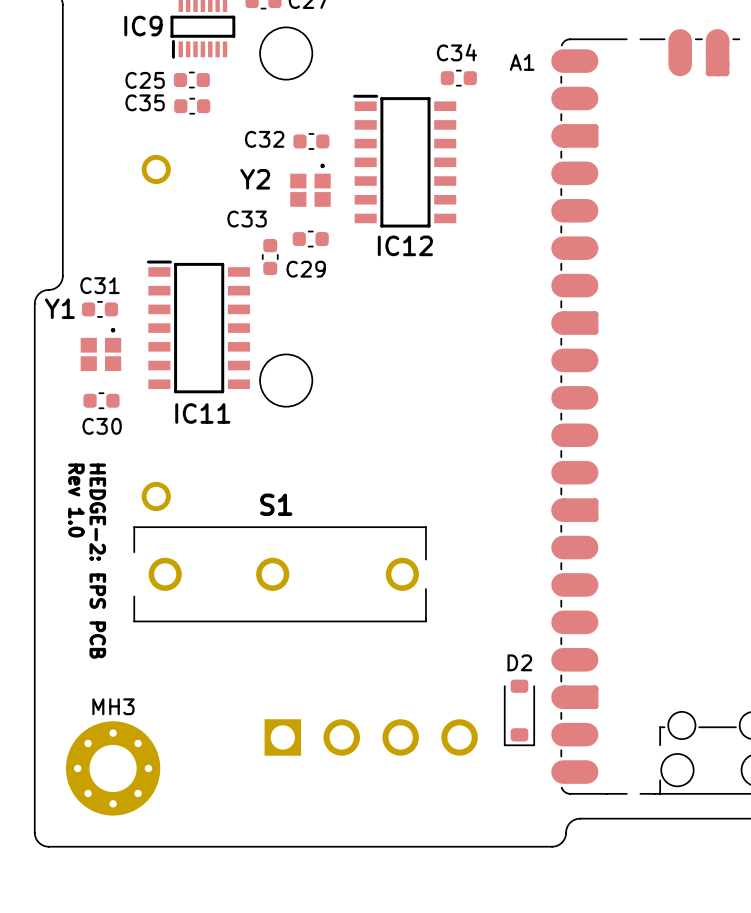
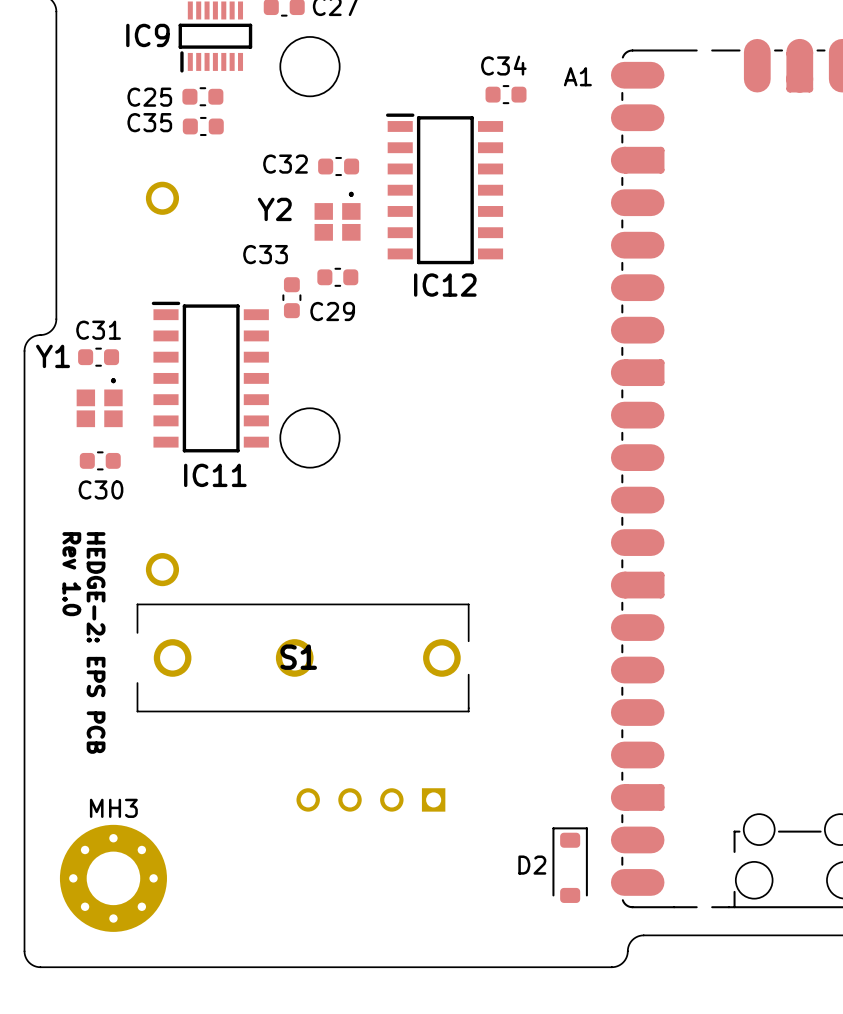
S1 name position: S1 (276, 504) -> S1 (298, 657)
D2 name position: D2 (519, 662) -> D2 (532, 865)
part: none -> (370, 799)
D2 rotation: 0° (519, 712) -> 180° (570, 865)
D2 position: (519, 712) -> (570, 865)
part: (371, 737) -> none

